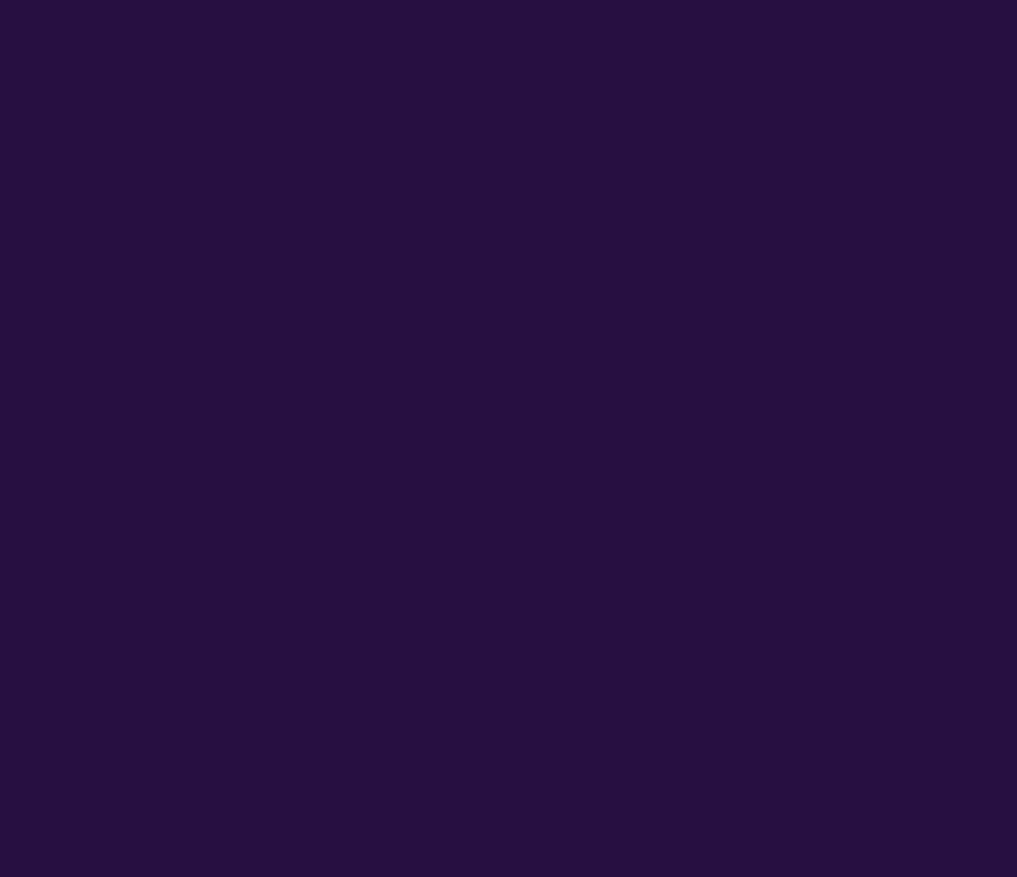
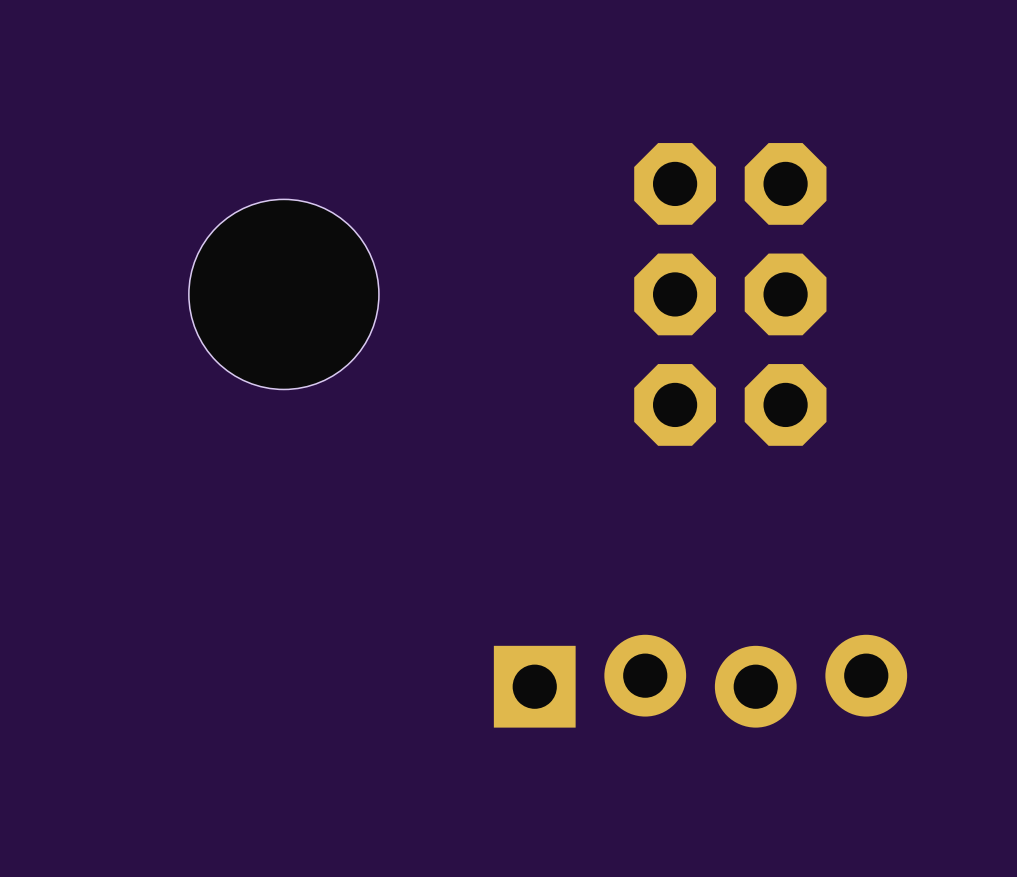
hole: none -> (283, 294)
part: none -> (730, 294)
part: none -> (700, 681)

